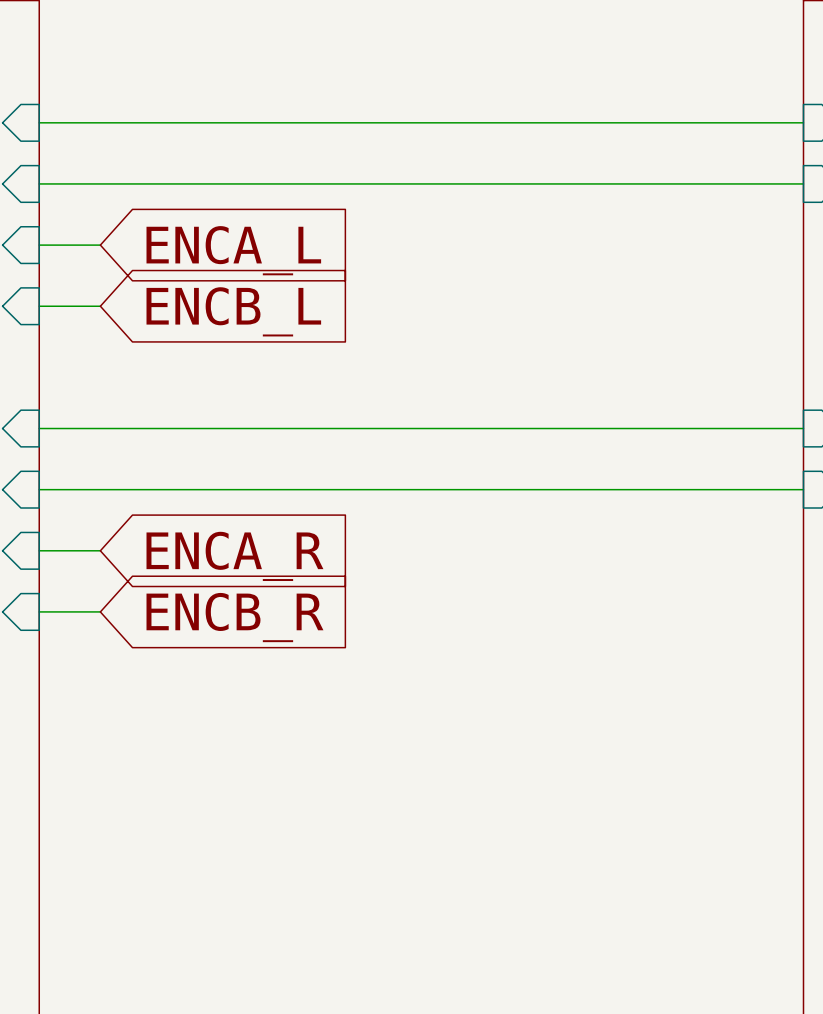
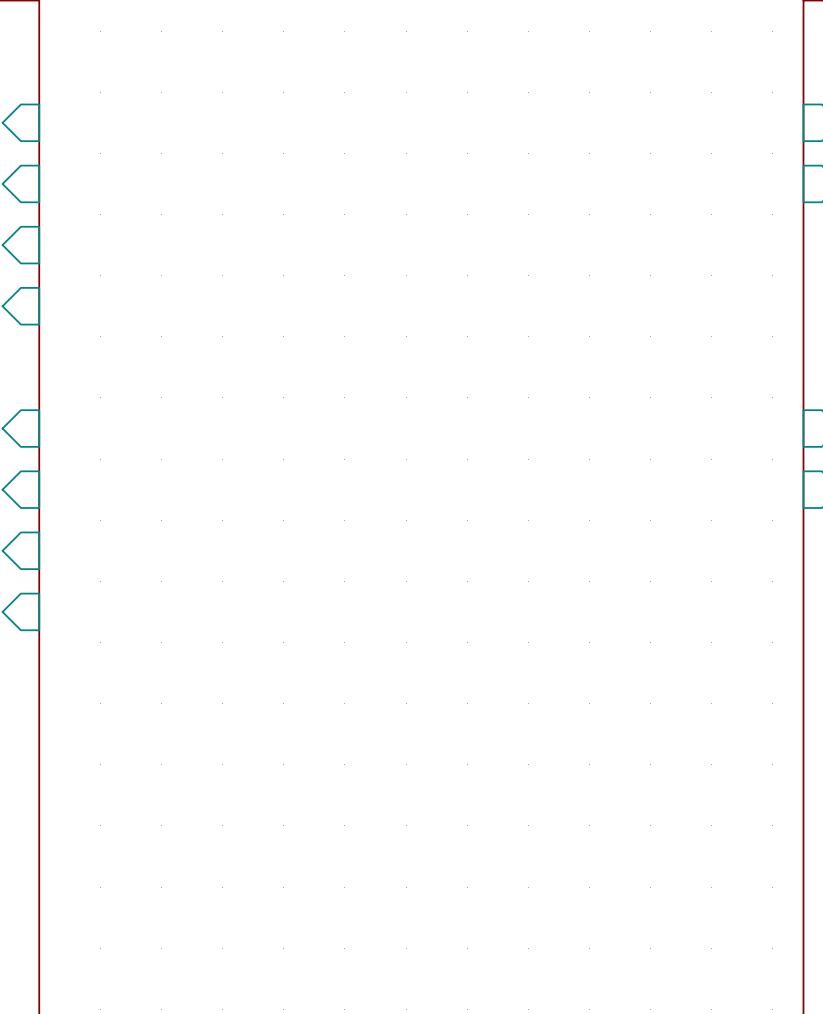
wire: (39, 122) (803, 122) -> none
wire: (39, 183) (803, 183) -> none
wire: (39, 245) (100, 245) -> none
global label: ENCA_L (233, 250) -> none
wire: (39, 306) (100, 306) -> none
global label: ENCB_L (233, 311) -> none
wire: (39, 428) (803, 428) -> none
wire: (39, 489) (803, 489) -> none
wire: (39, 550) (100, 550) -> none
global label: ENCA_R (234, 556) -> none
wire: (39, 611) (100, 611) -> none
global label: ENCB_R (234, 617) -> none

